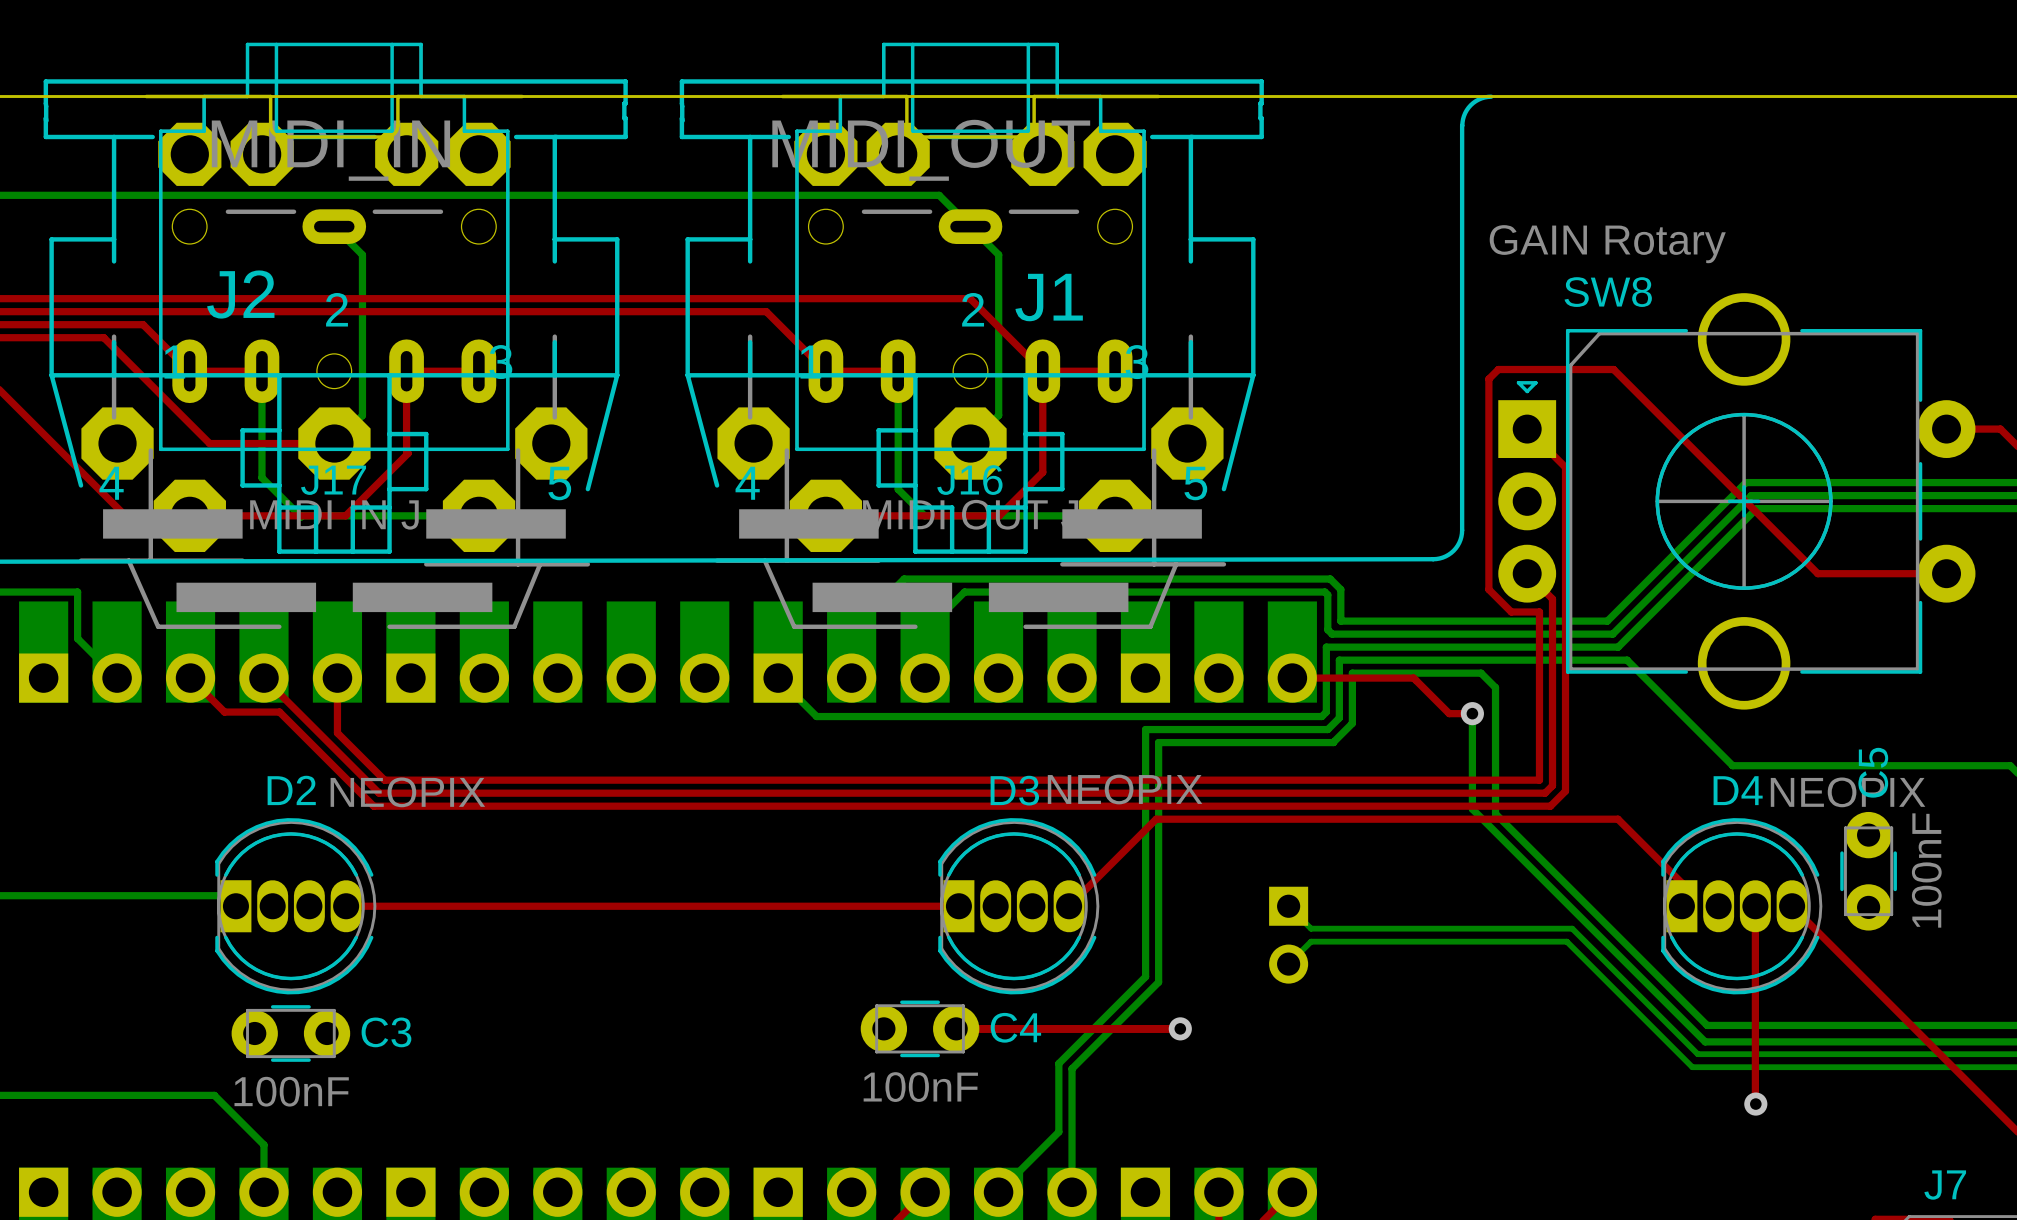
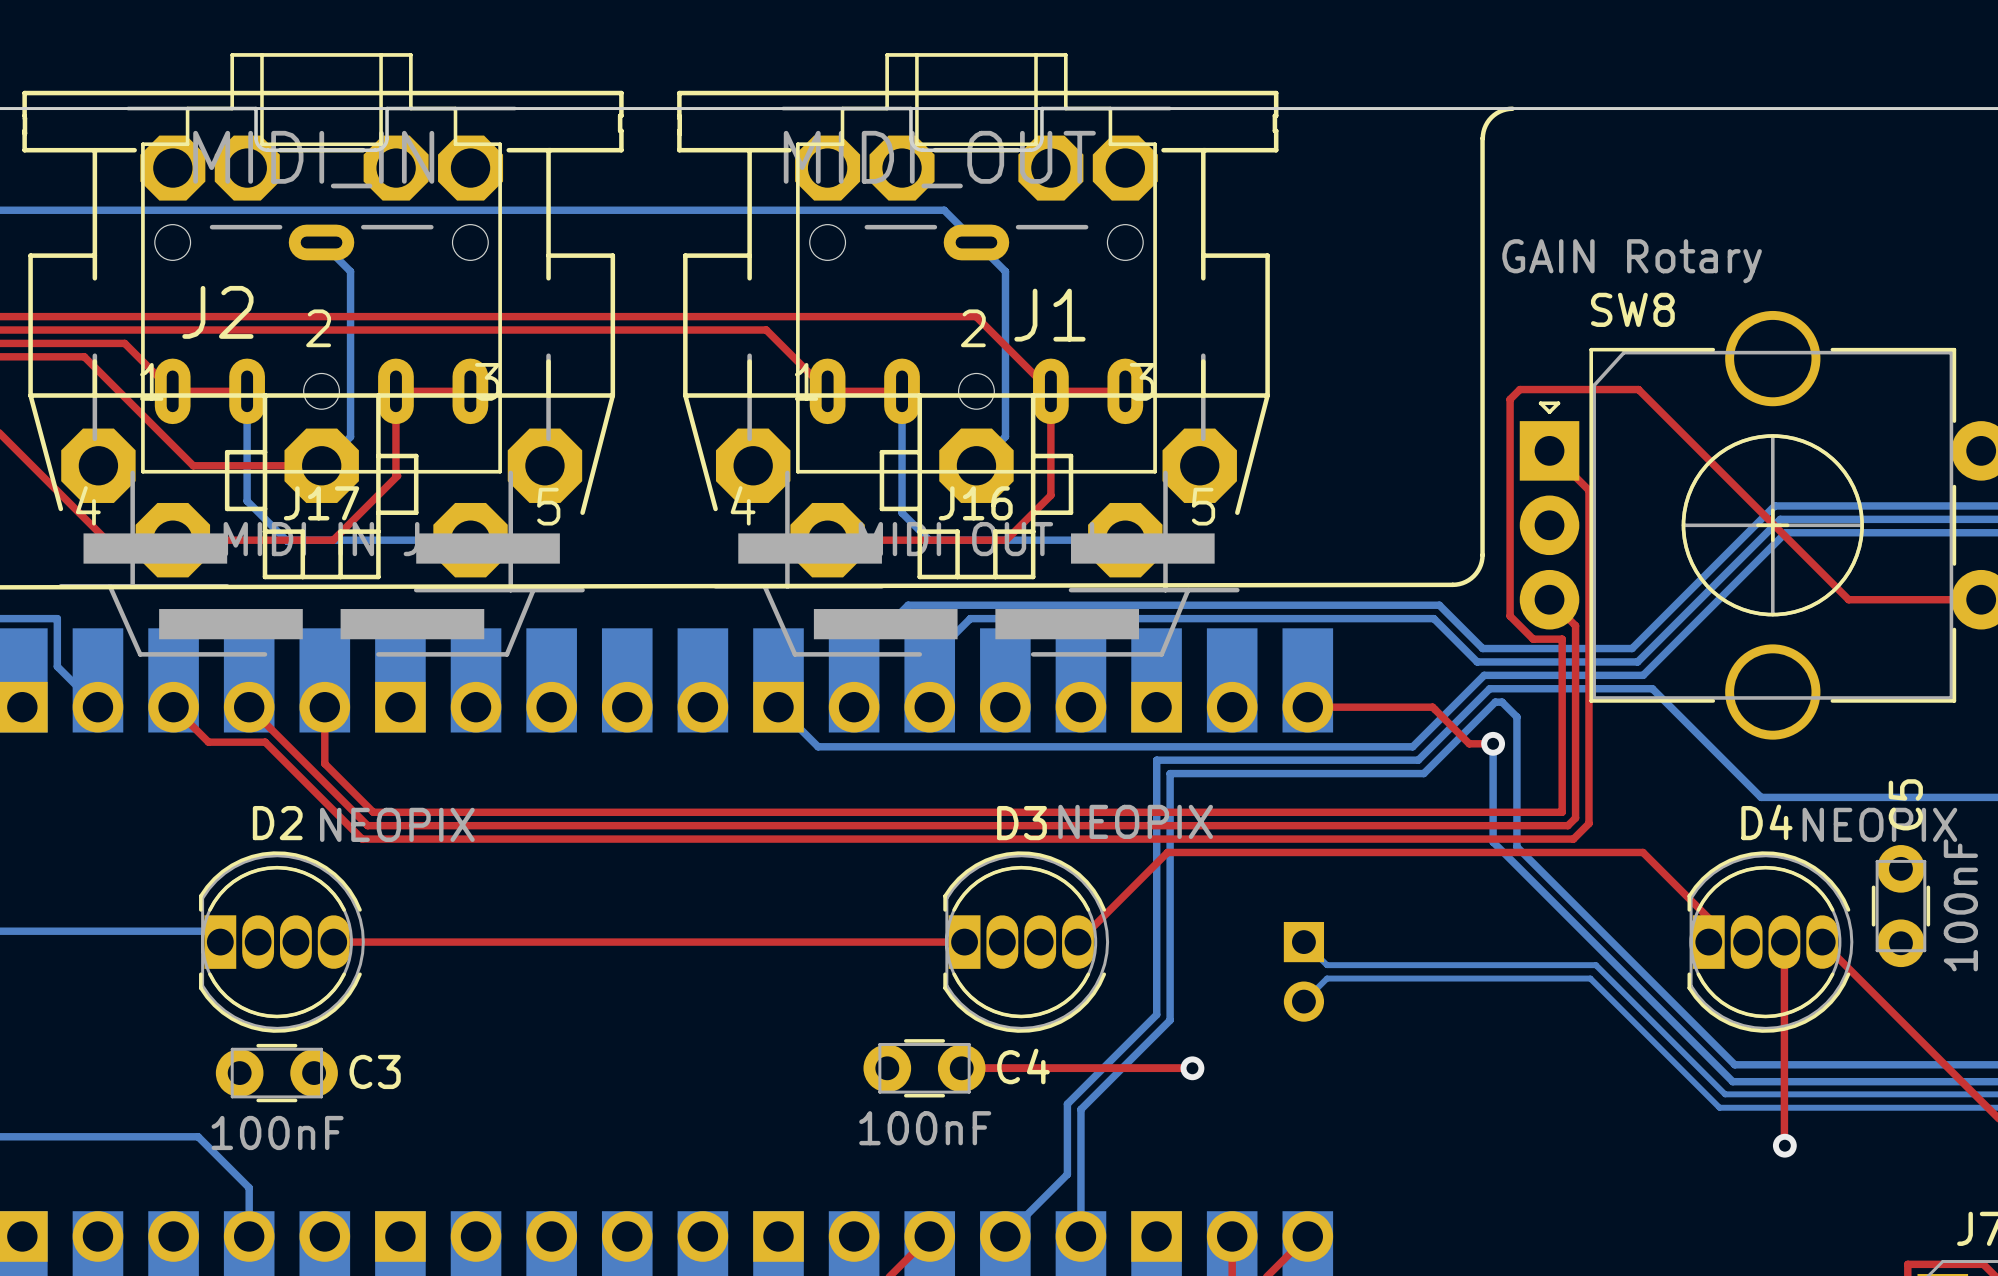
bottom track: (1330, 579) (1340, 589) (1340, 621) (1462, 621) -> (1346, 605) (1439, 605) (1482, 648)
bottom track: (1324, 592) (1327, 594) (1327, 629) (1332, 634) (1456, 634) -> (1341, 618) (1433, 618) (1477, 661)
bottom track: (1463, 647) (1326, 647) (1326, 712) (1321, 716) -> (1484, 675) (1412, 746) (1338, 746)
bottom track: (1469, 660) (1339, 660) (1339, 717) (1327, 729) -> (1489, 688) (1418, 760) (1344, 760)
bottom track: (1474, 673) (1352, 673) (1352, 723) (1333, 742) -> (1495, 702) (1423, 773) (1350, 773)

